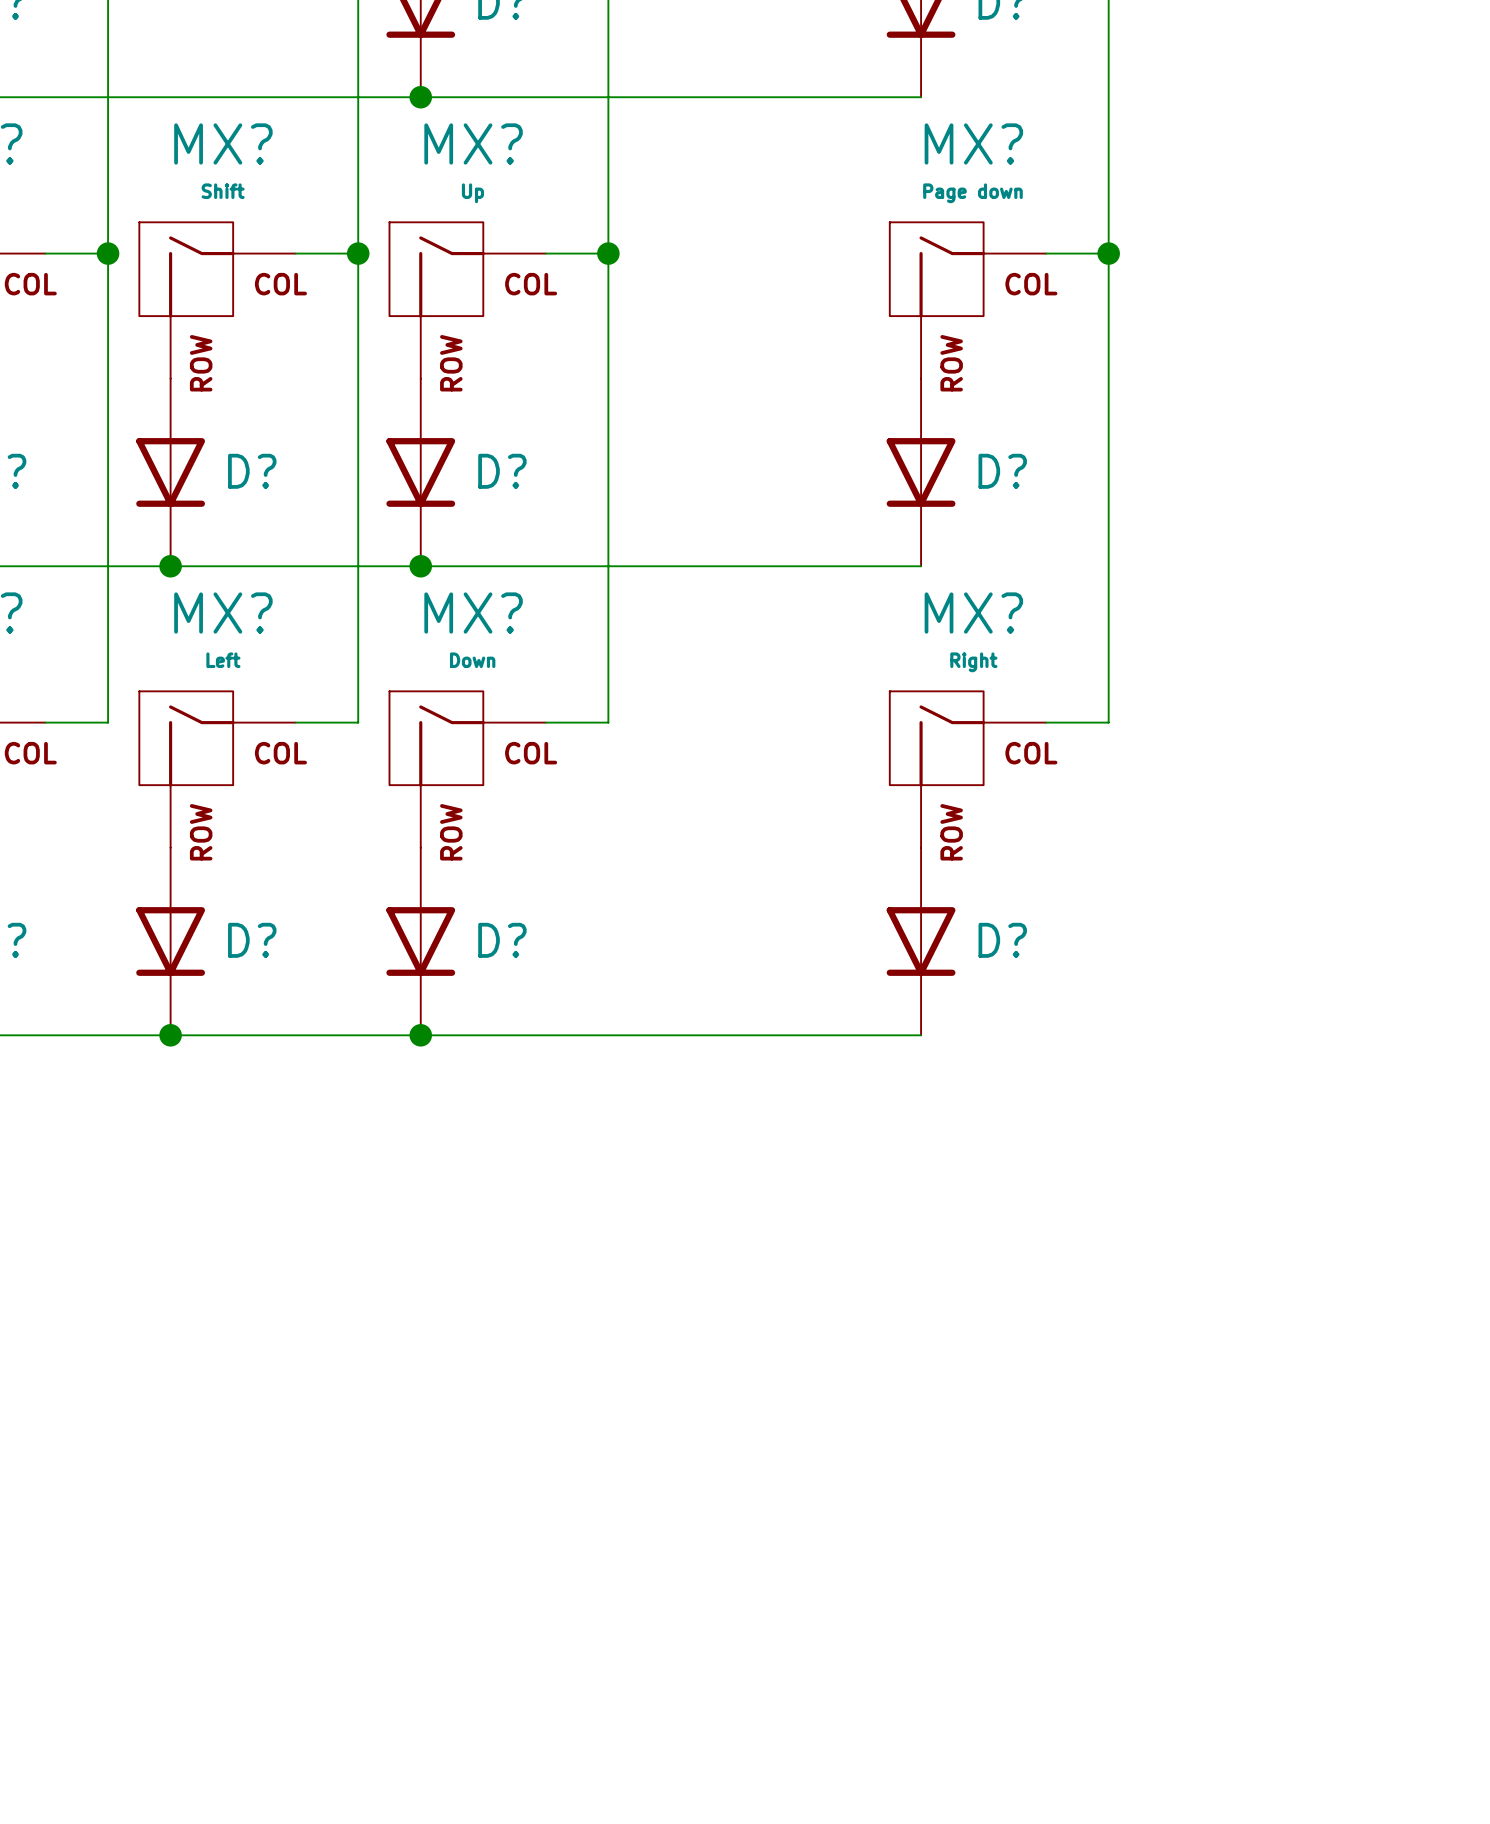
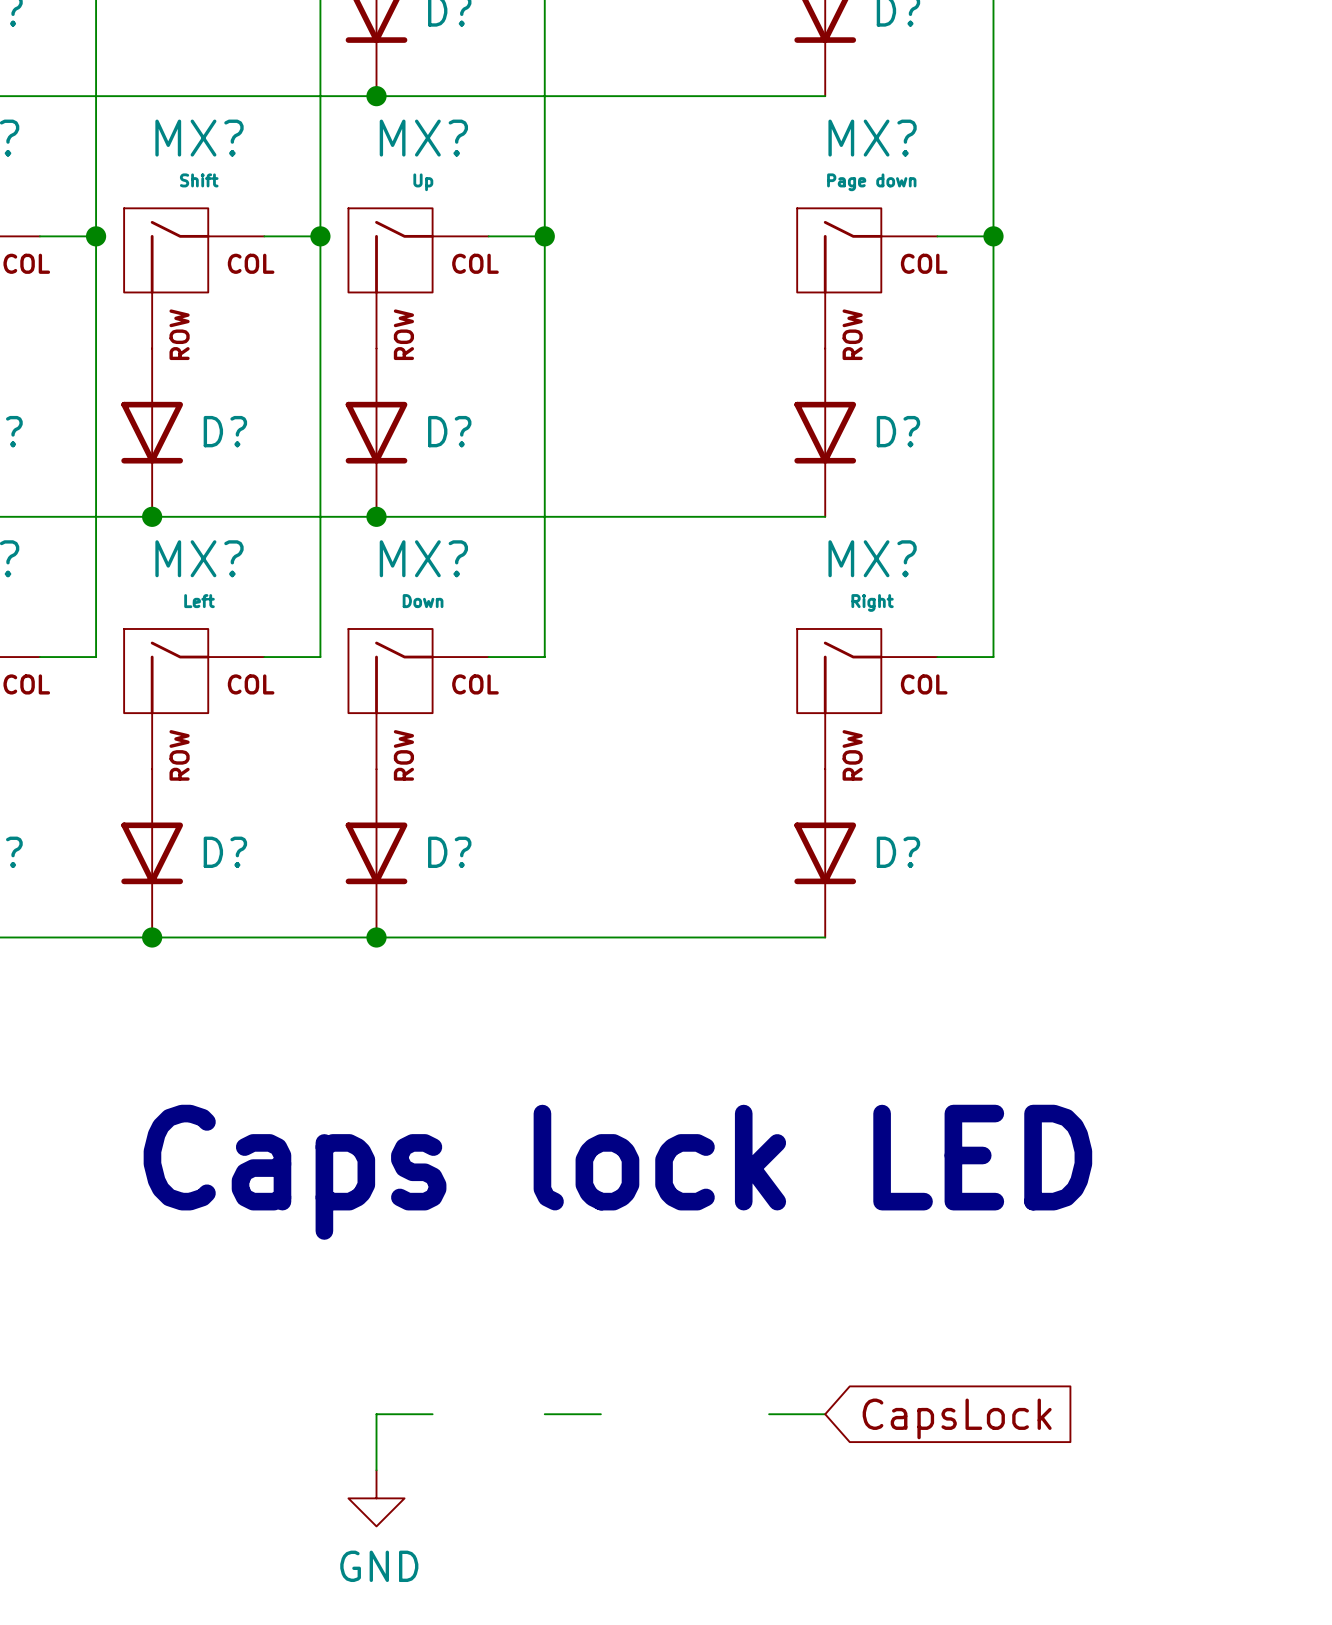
text: none -> Caps lock LED (617, 1172)
wire: none -> (432, 1414) (376, 1414) (376, 1470)
wire: none -> (544, 1414) (600, 1414)
wire: none -> (769, 1414) (825, 1414)
global label: none -> CapsLock (957, 1418)
power symbol: none -> GND (376, 1498)

